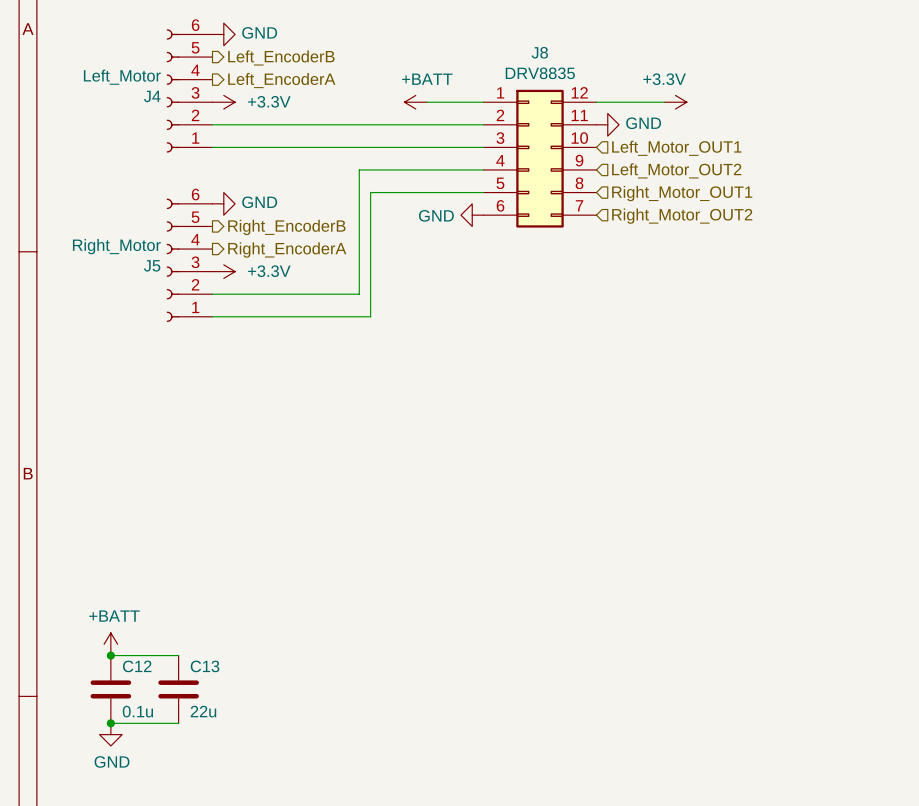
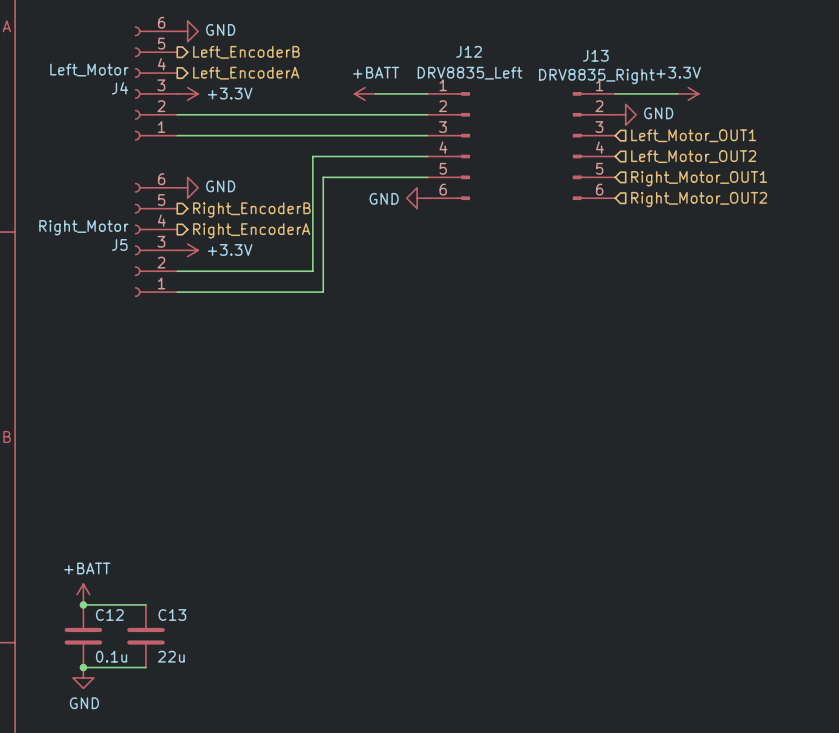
wire: (596, 102) (664, 102) -> (615, 93) (677, 93)
power symbol position: +3.3V (675, 102) -> +3.3V (688, 93)
power symbol position: GND (607, 124) -> GND (625, 114)
hierarchical label position: Left_Motor_OUT1 (676, 148) -> Left_Motor_OUT1 (693, 135)
J12: none -> DRV8835_Left (448, 146)
J8: DRV8835 (540, 158) -> none
J13: none -> DRV8835_Right (594, 146)
hierarchical label position: Left_Motor_OUT2 (676, 170) -> Left_Motor_OUT2 (693, 156)
hierarchical label position: Right_Motor_OUT1 (682, 193) -> Right_Motor_OUT1 (699, 178)
hierarchical label position: Right_Motor_OUT2 (682, 216) -> Right_Motor_OUT2 (699, 199)

